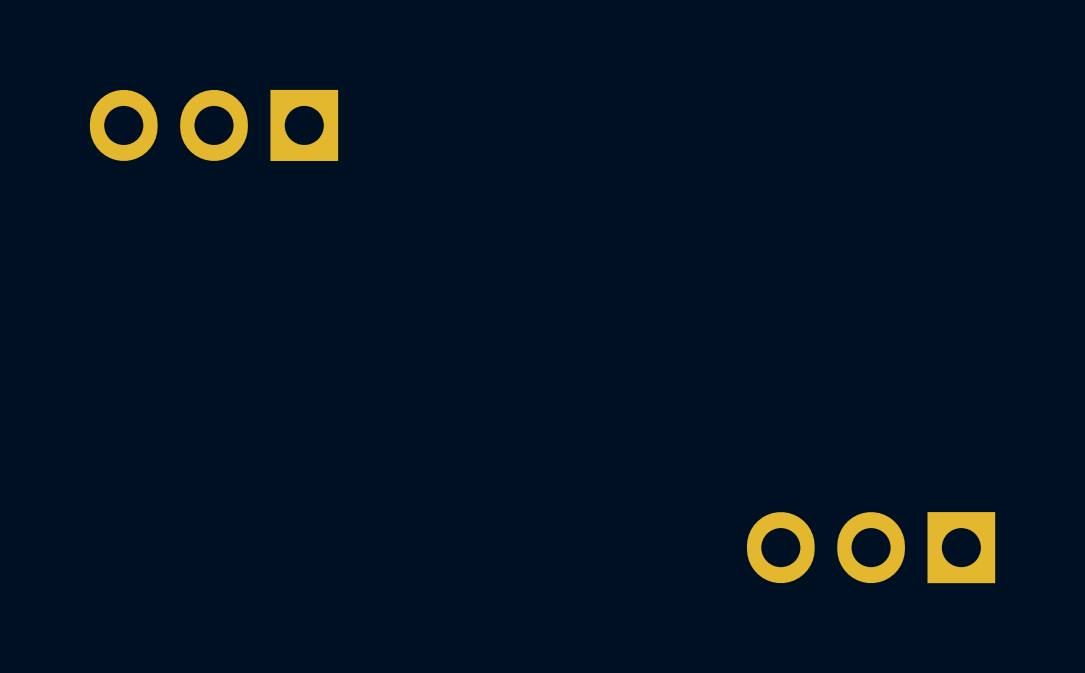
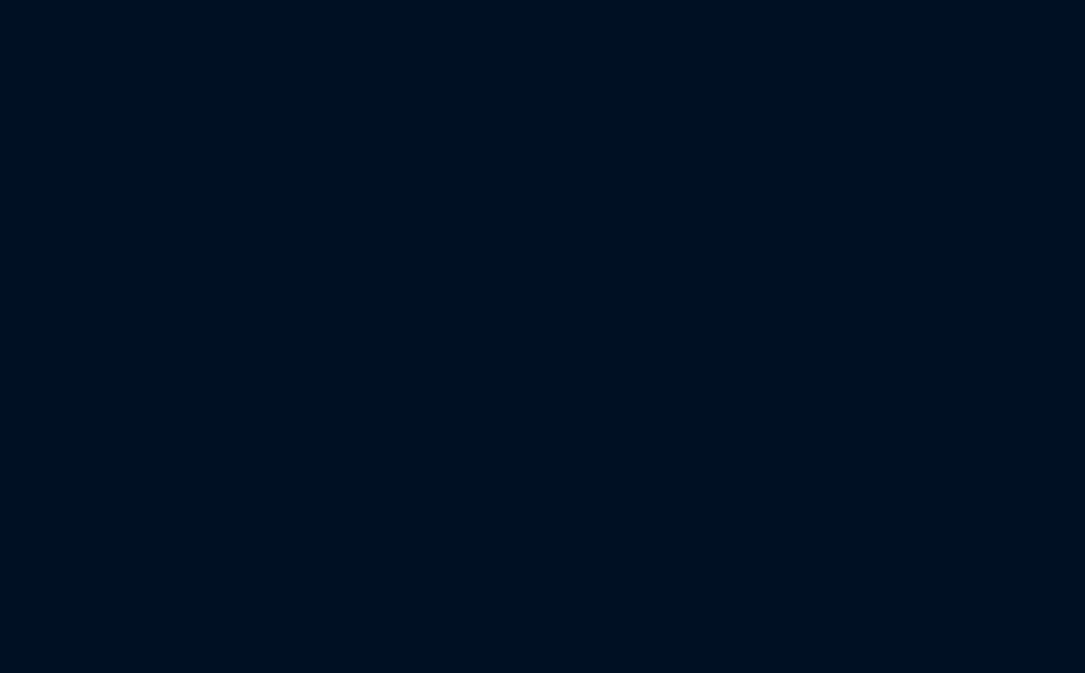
part: (214, 125) -> none
part: (871, 547) -> none

